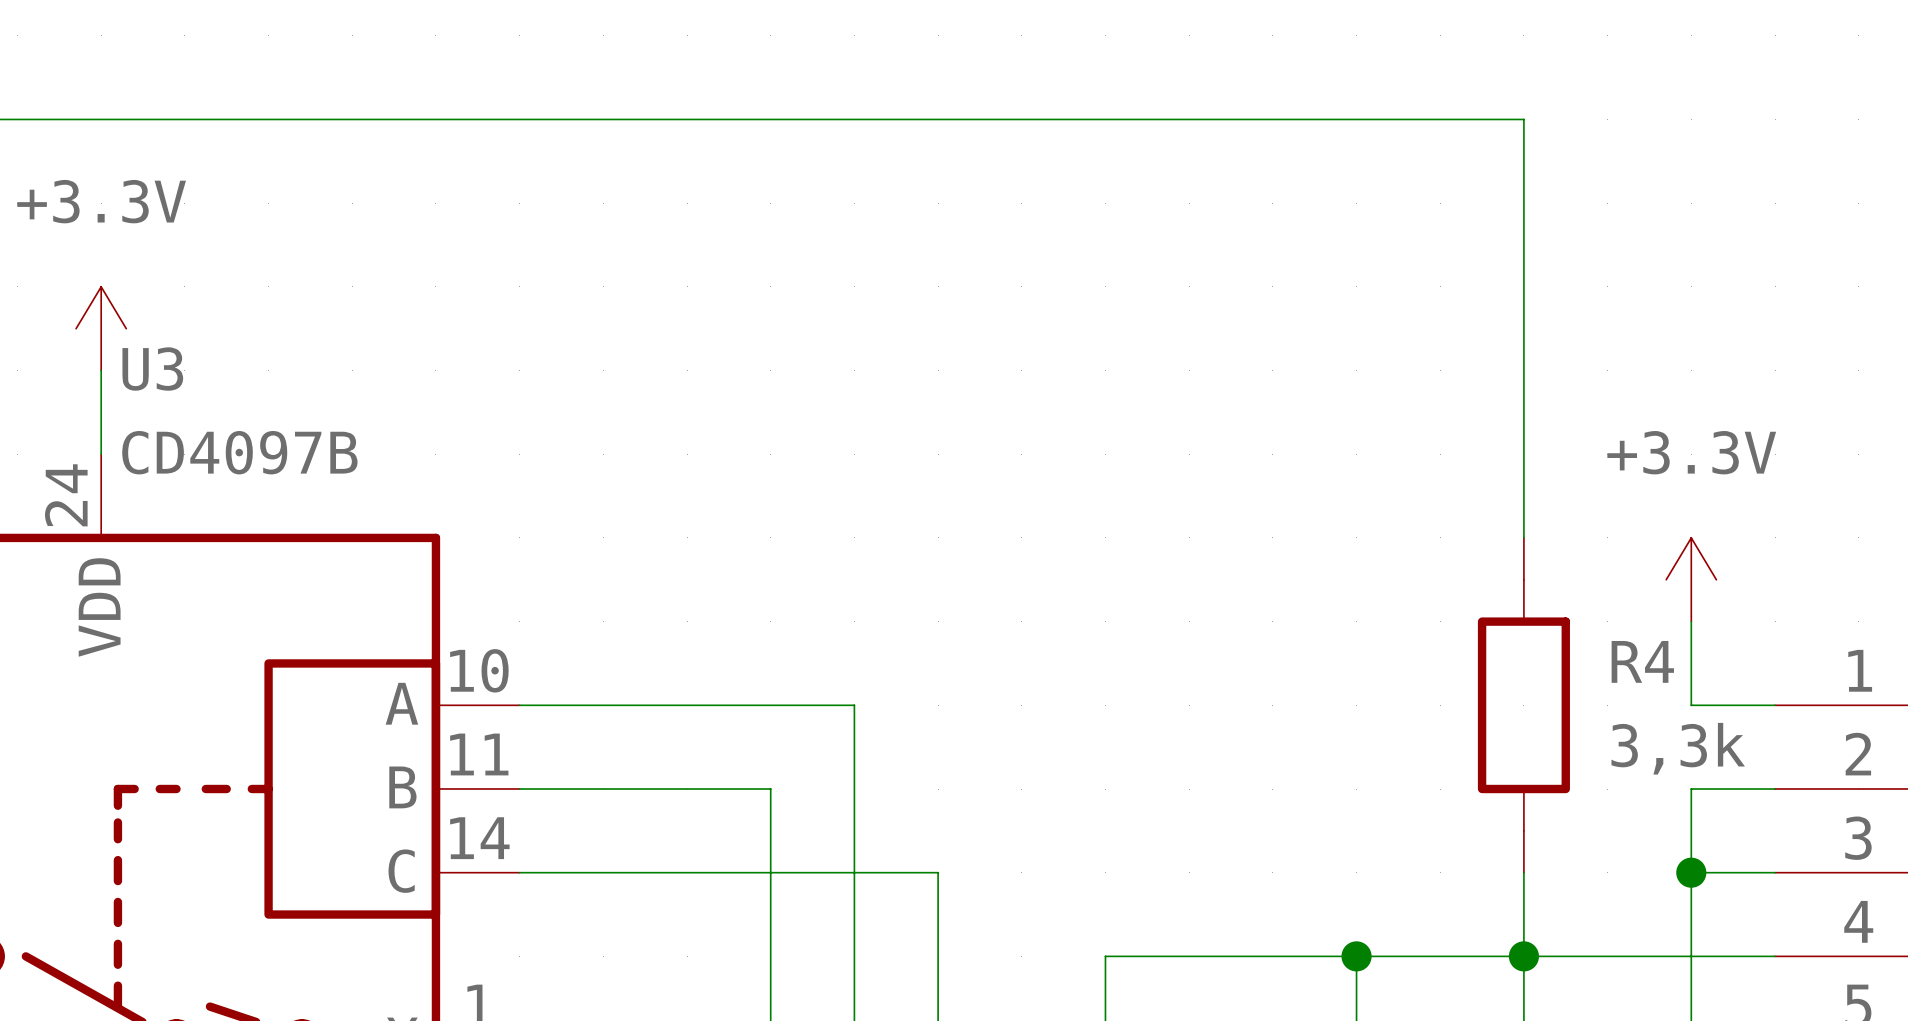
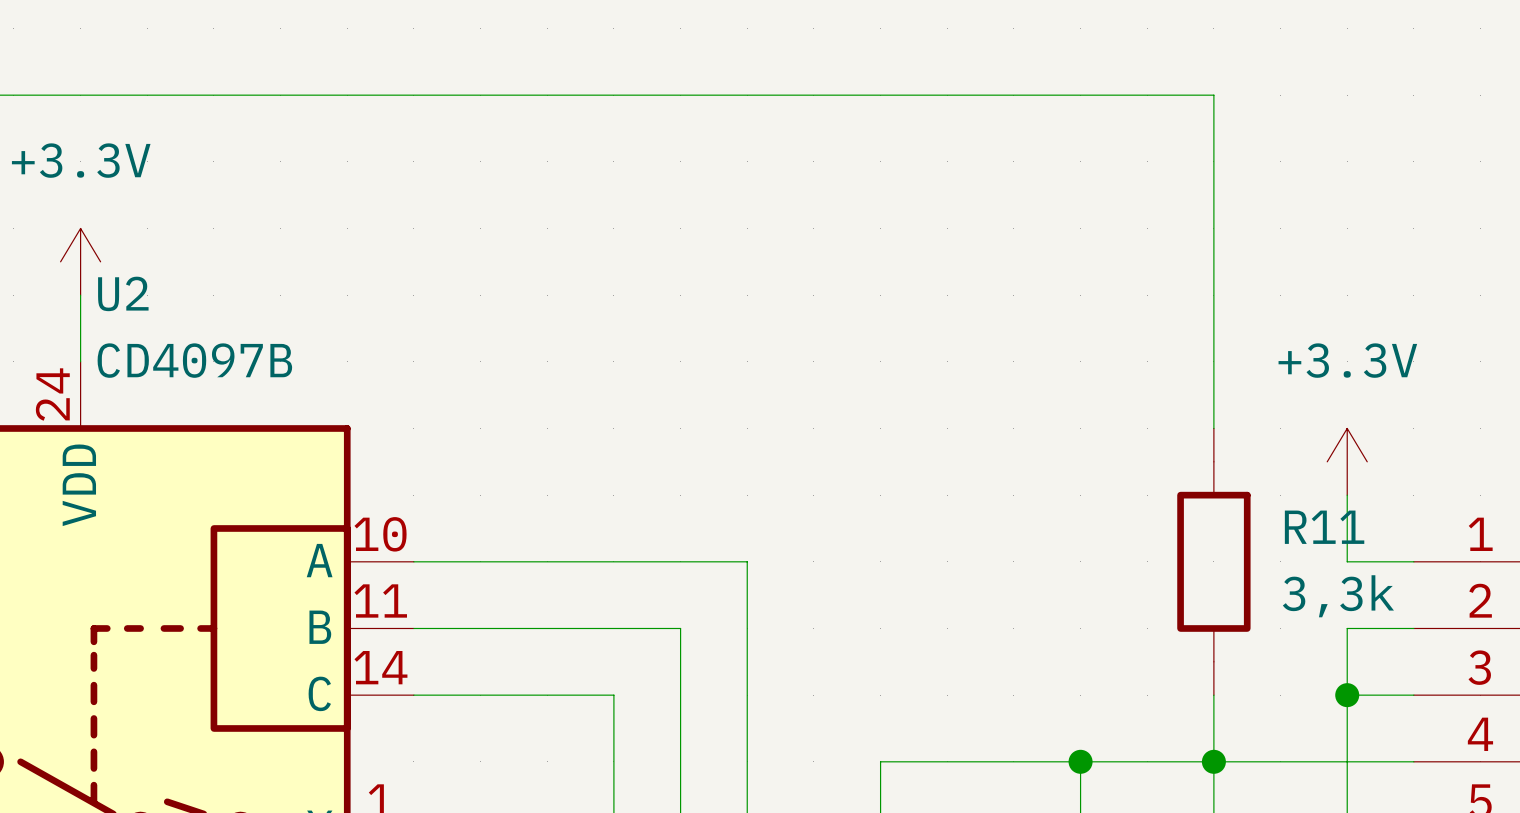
U3 name: U3 (152, 369) -> U2 (123, 293)
R4 name: R4 (1642, 661) -> R11 (1324, 527)
wire: (854, 705) (854, 789) -> (613, 628) (680, 628)
wire: (770, 789) (770, 872) (938, 872) -> (680, 561) (747, 561) (747, 695)

